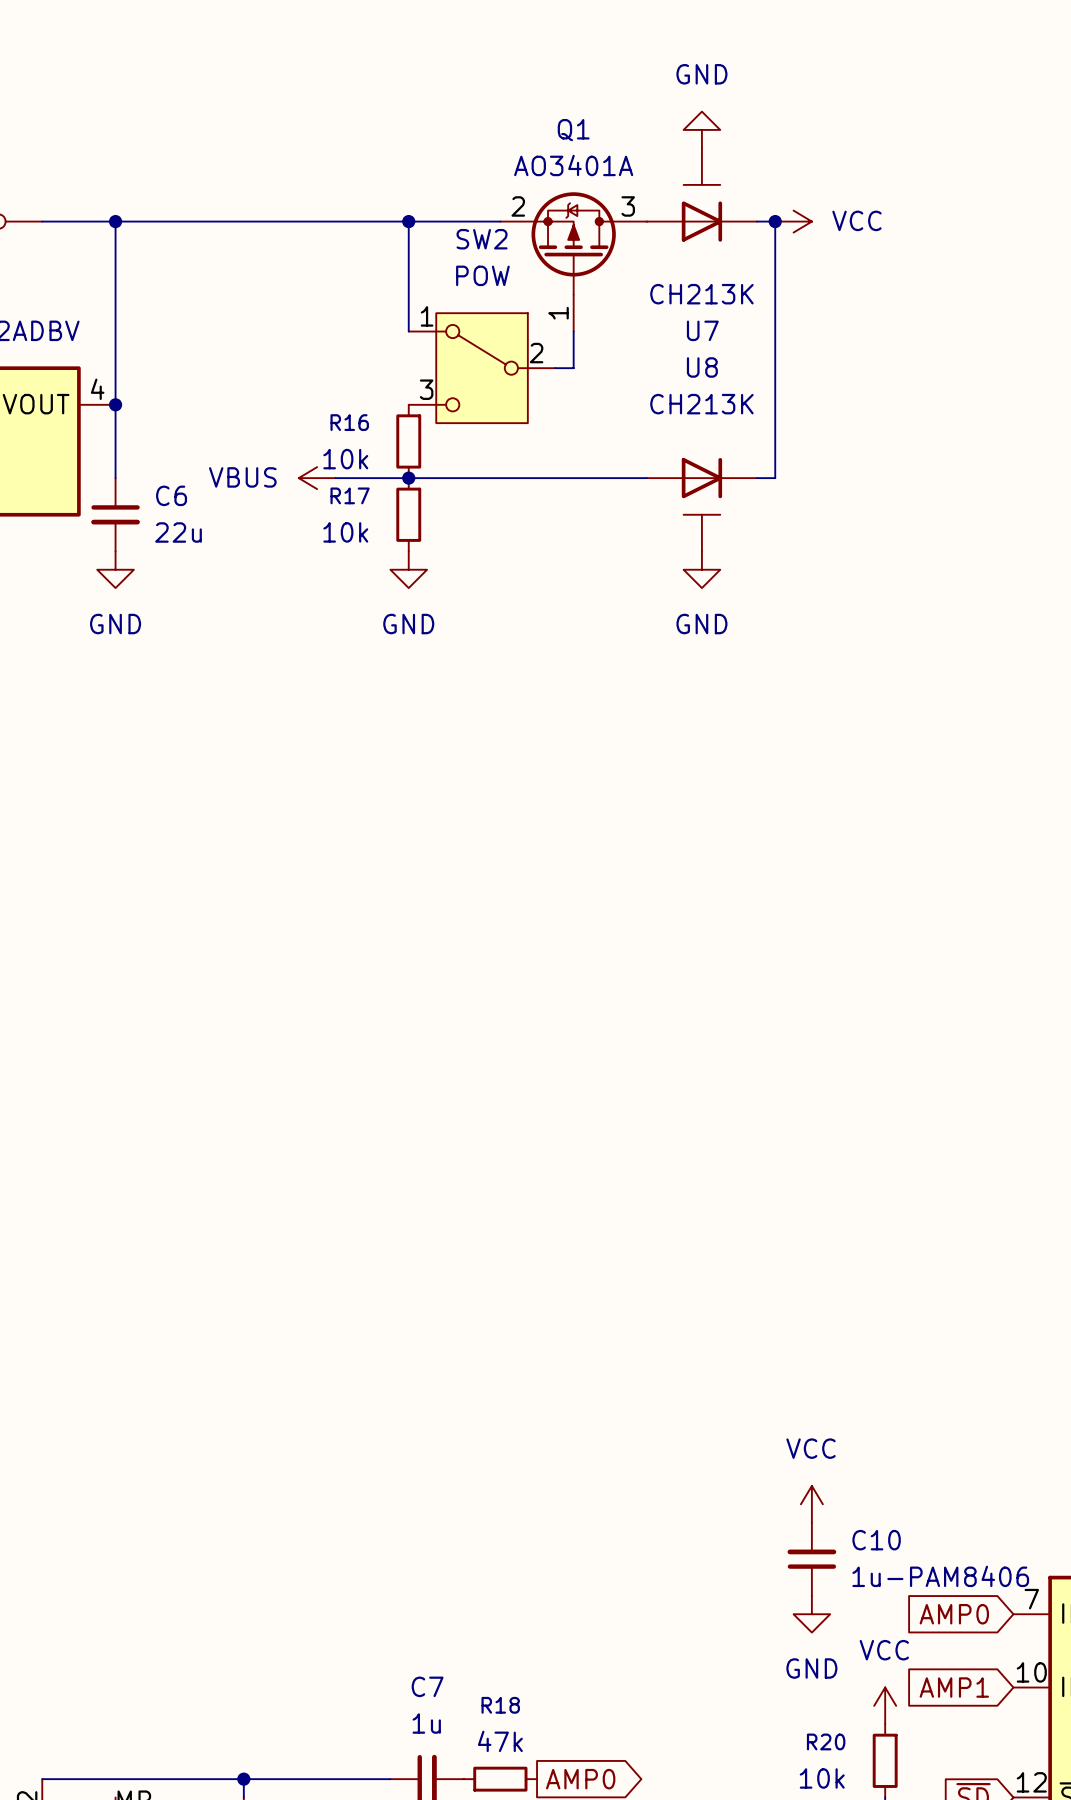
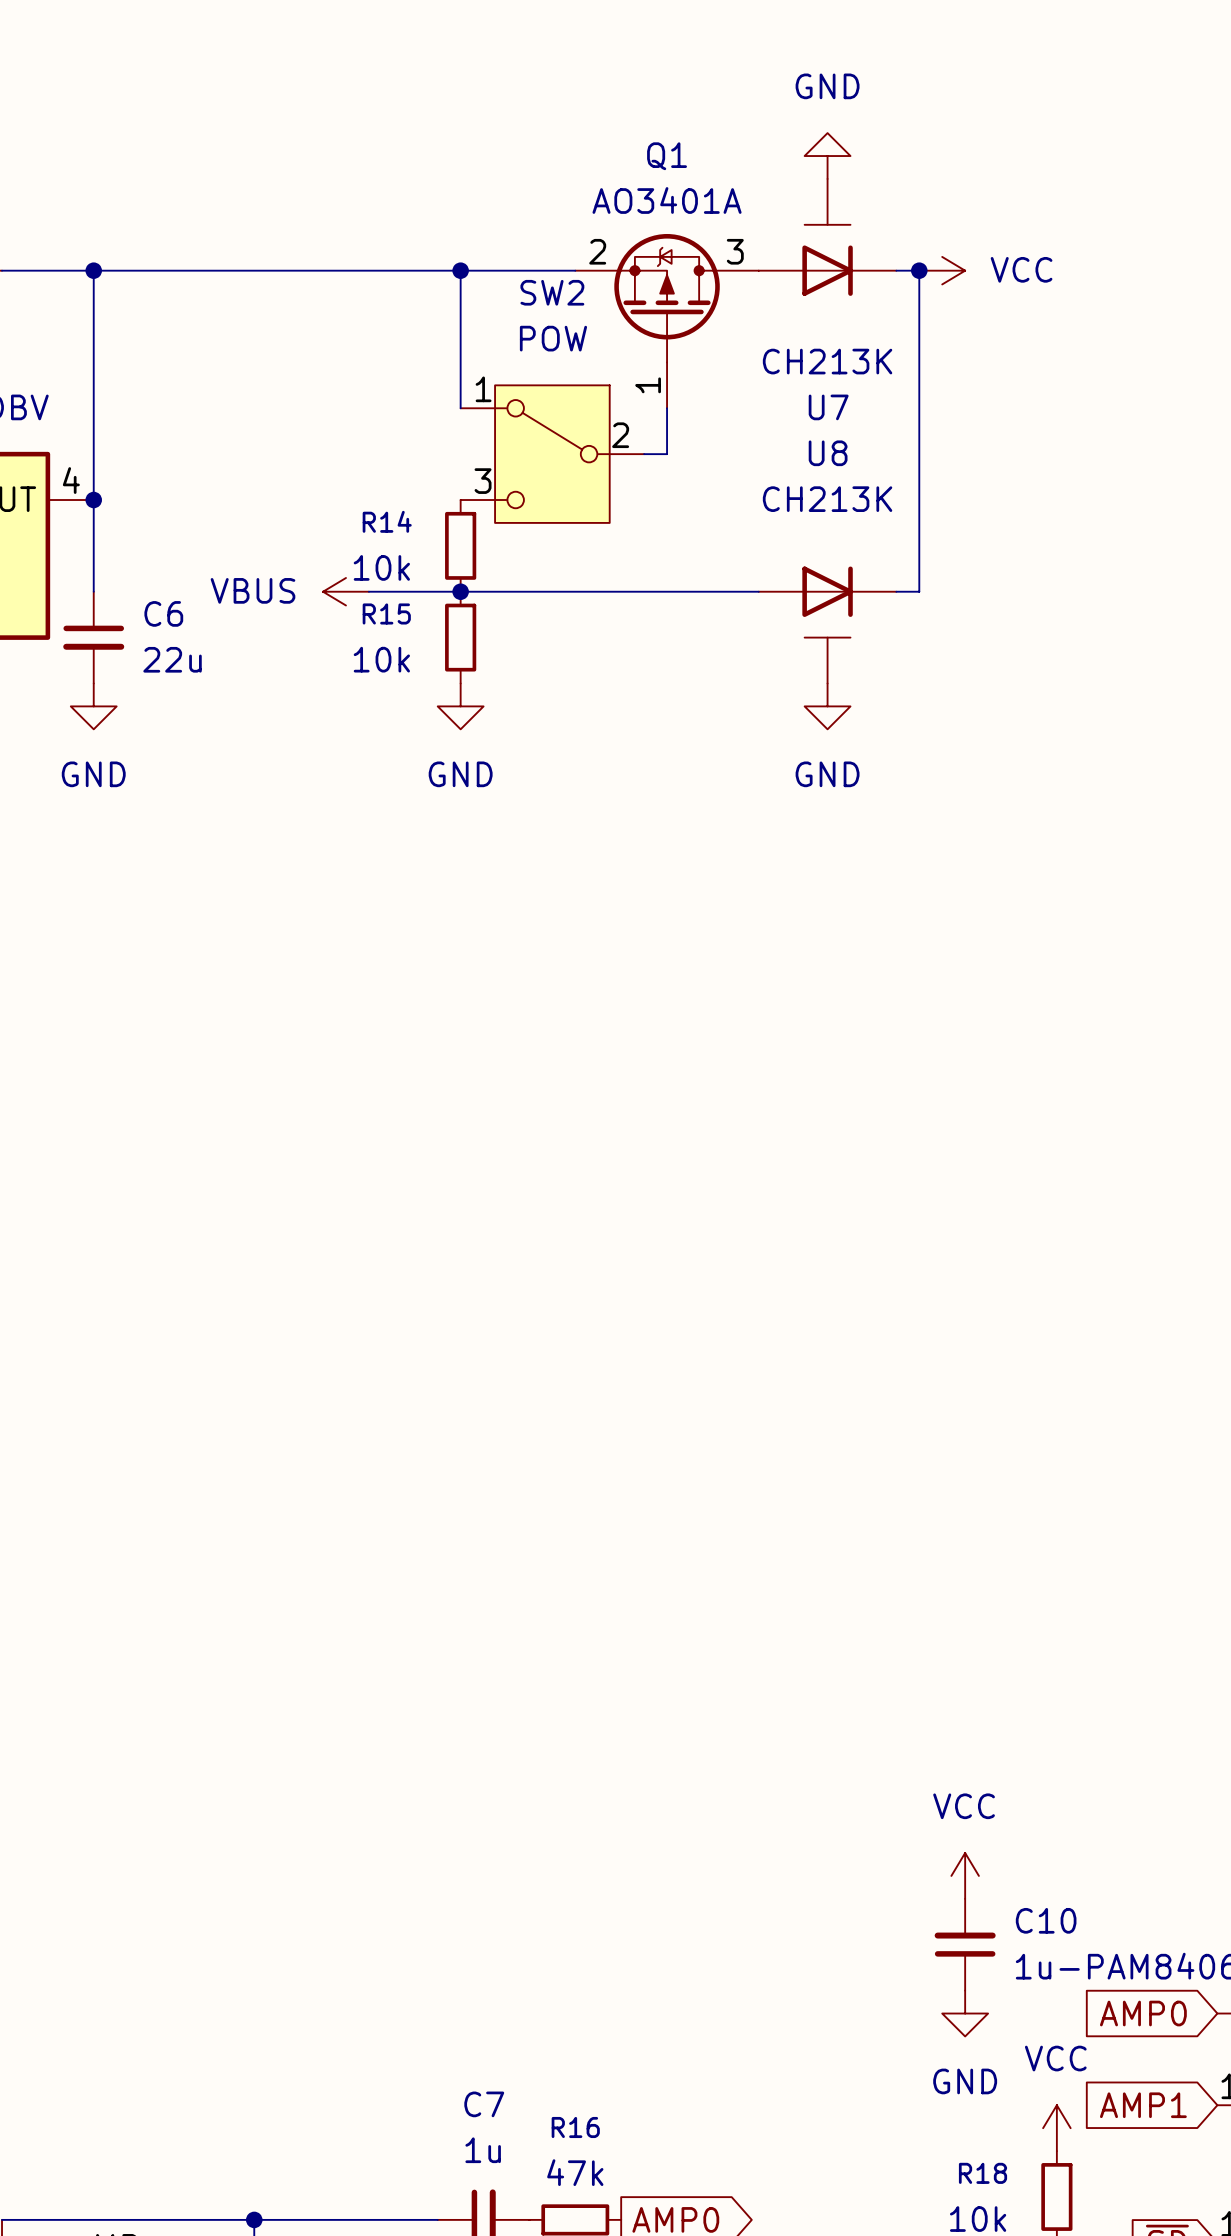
R16 name: R16 (349, 422) -> R14 (387, 521)
R17 name: R17 (350, 495) -> R15 (386, 613)
R18 name: R18 (500, 1705) -> R16 (575, 2127)
R20 name: R20 (826, 1741) -> R18 (983, 2173)

